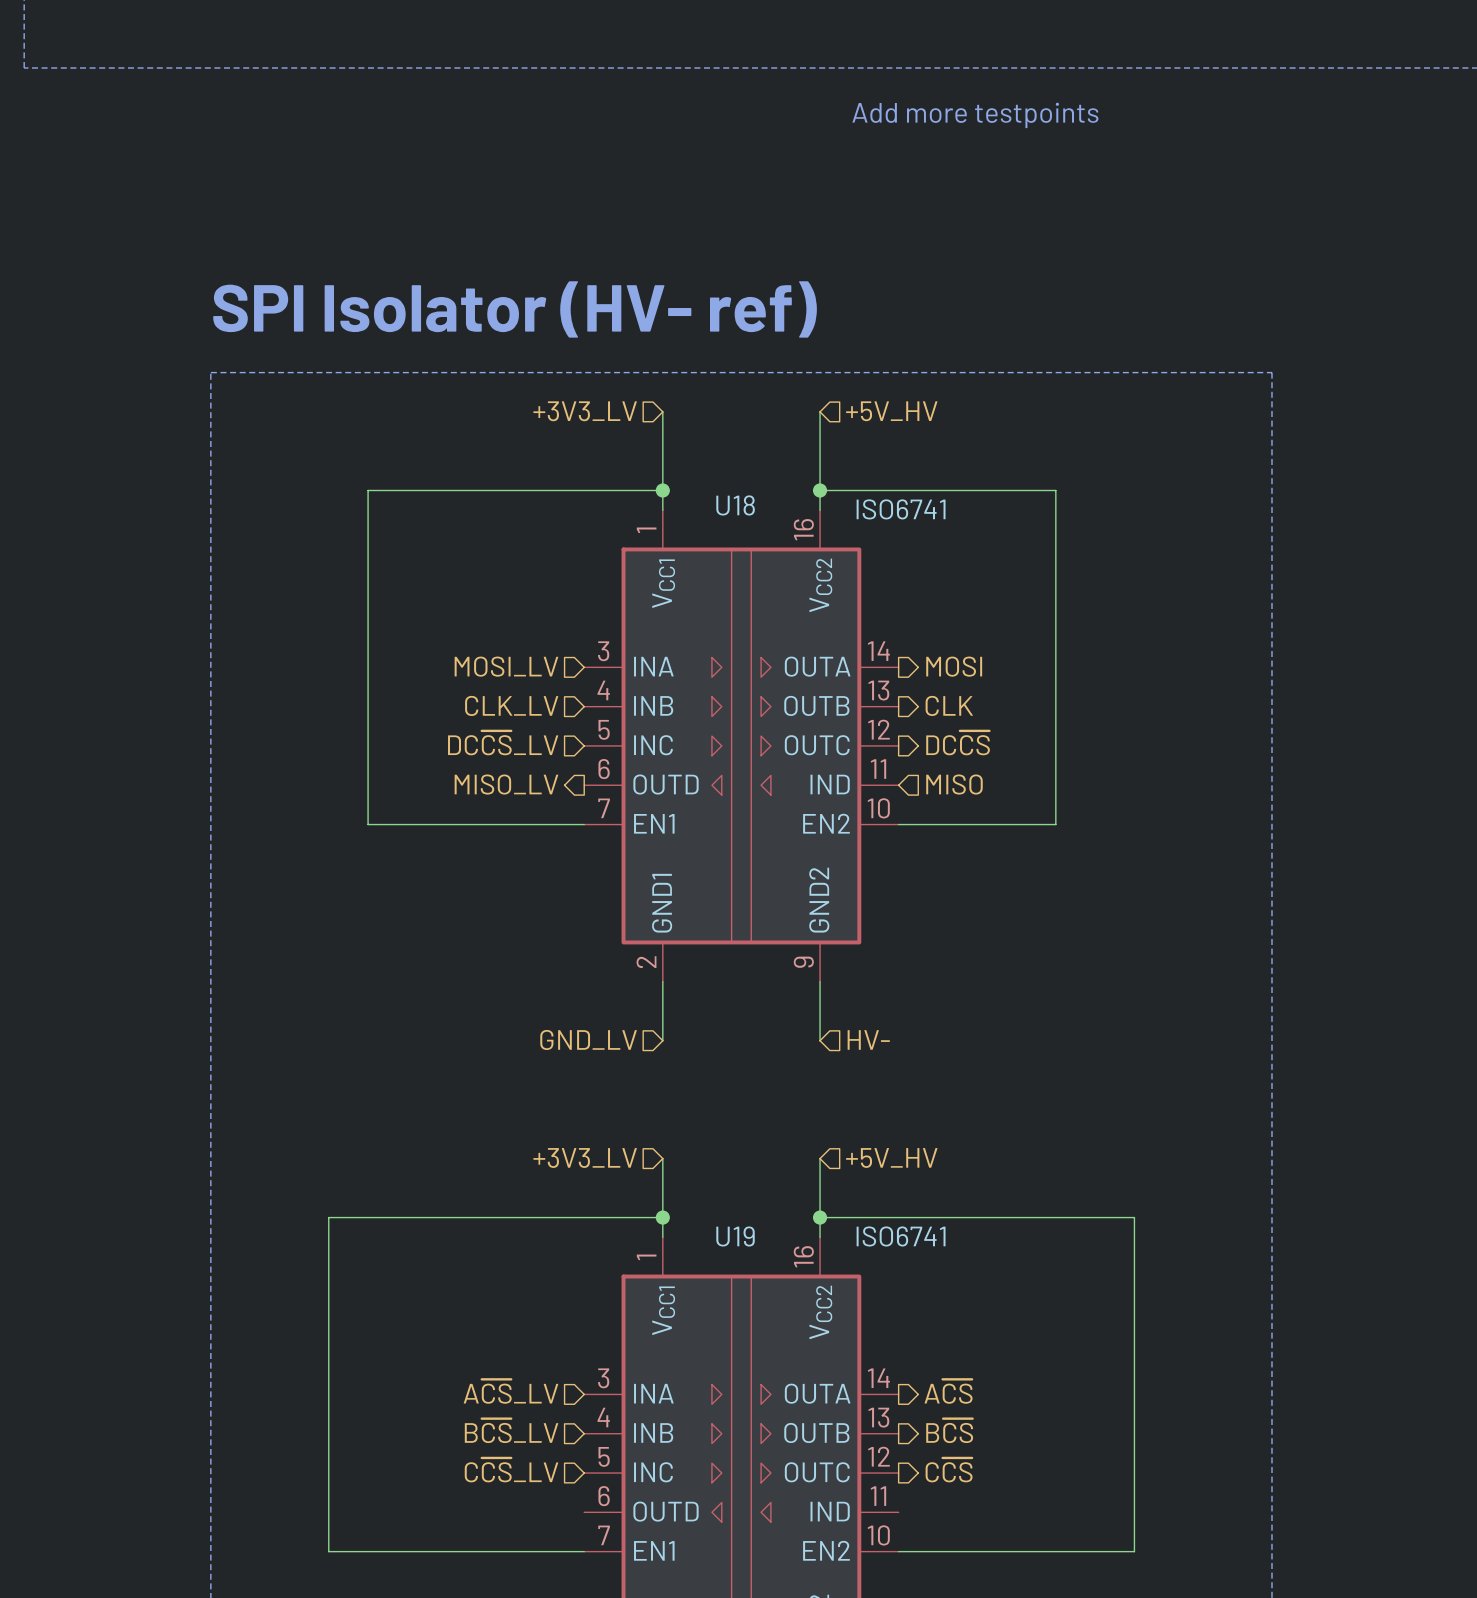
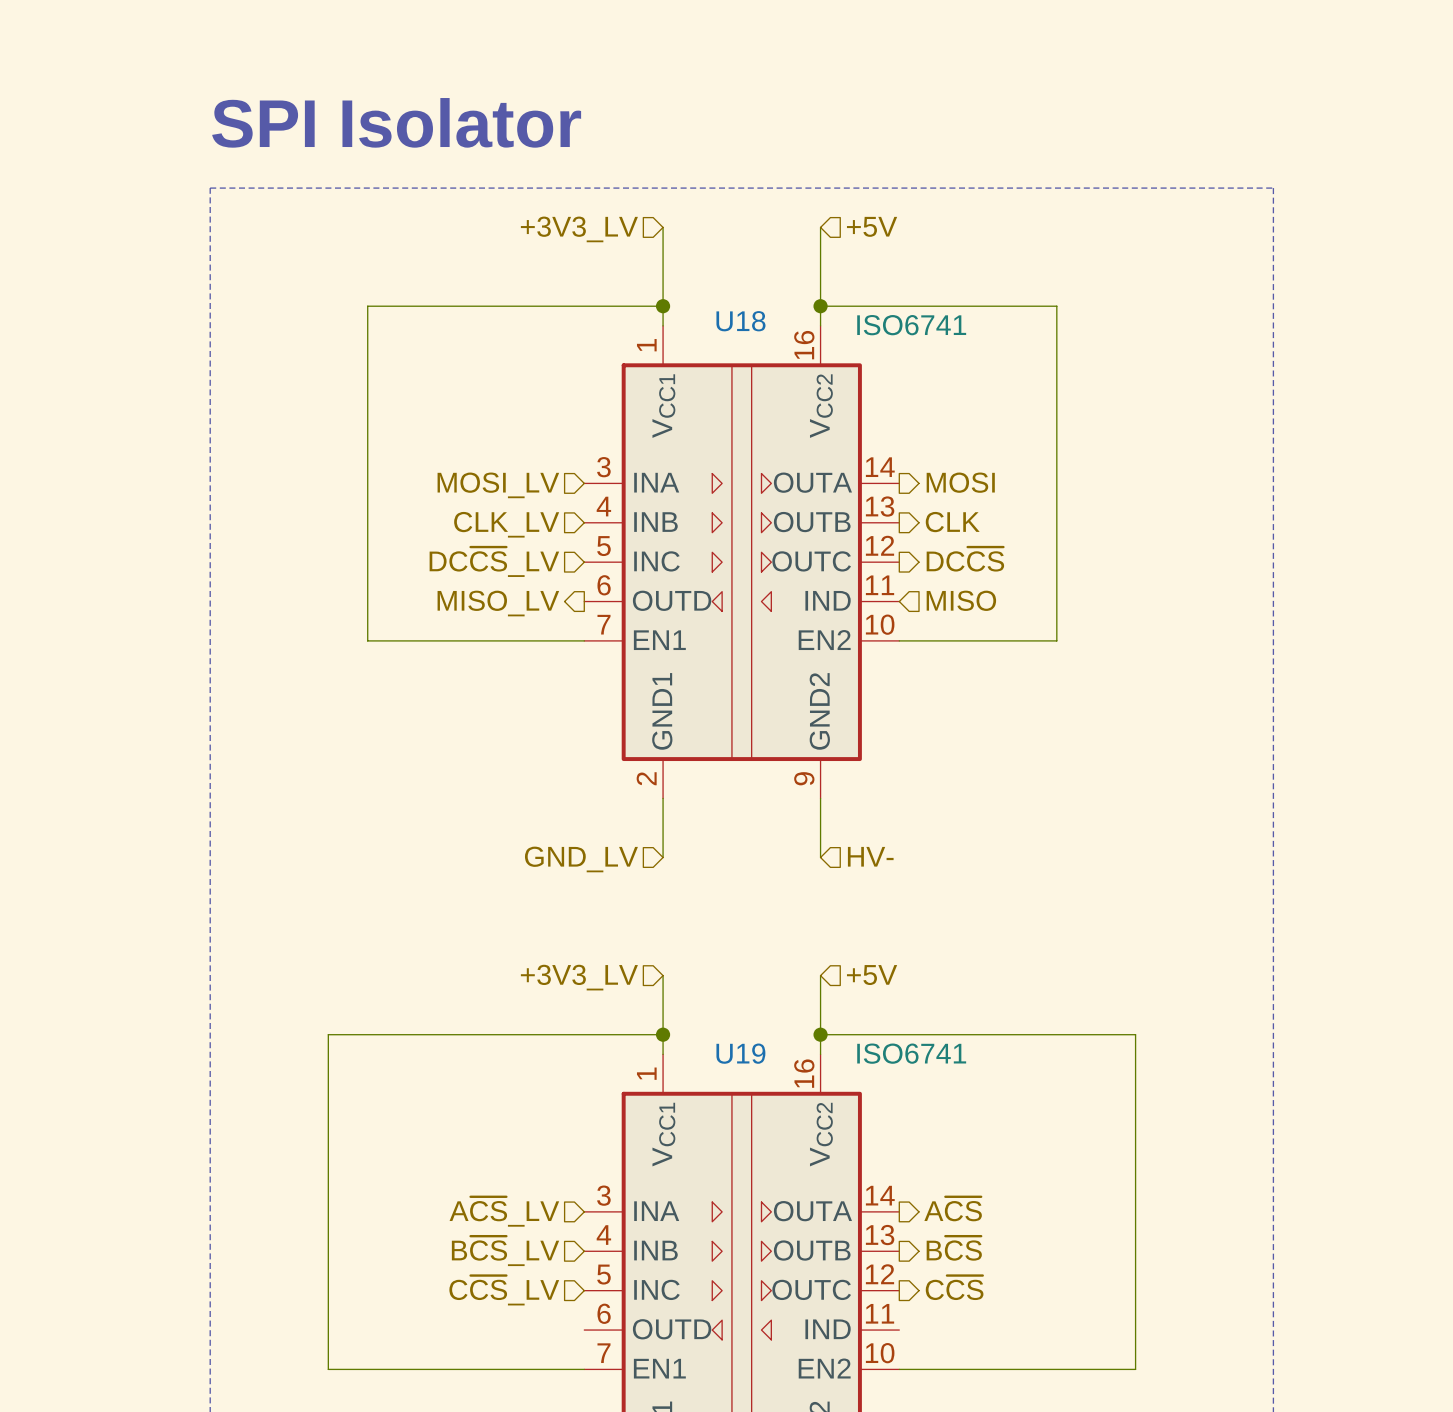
text: SPI Isolator (HV- ref) (515, 309) -> SPI Isolator (396, 122)
hierarchical label: +5V_HV (891, 411) -> +5V (872, 226)
hierarchical label: +5V_HV (891, 1157) -> +5V (872, 975)

